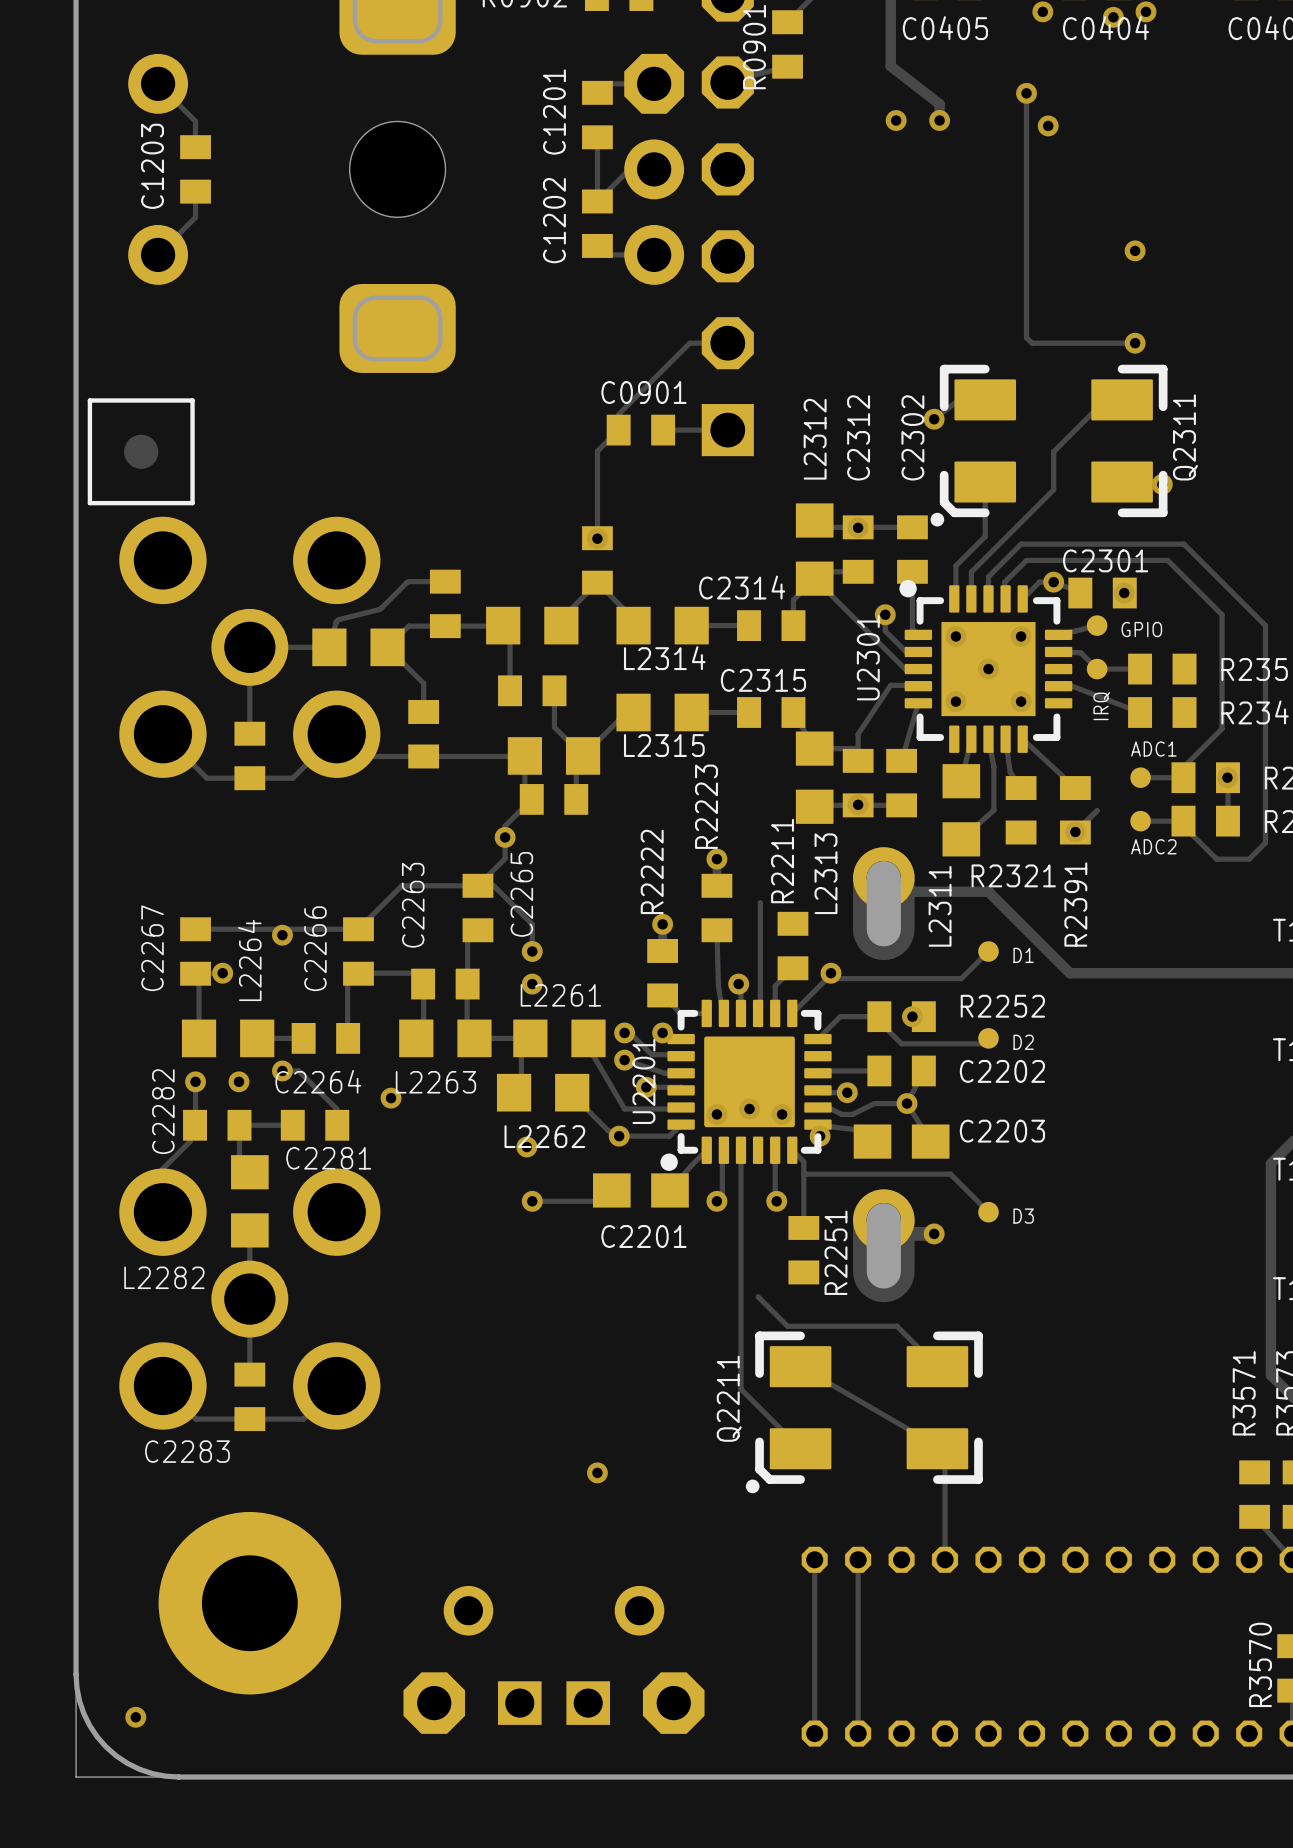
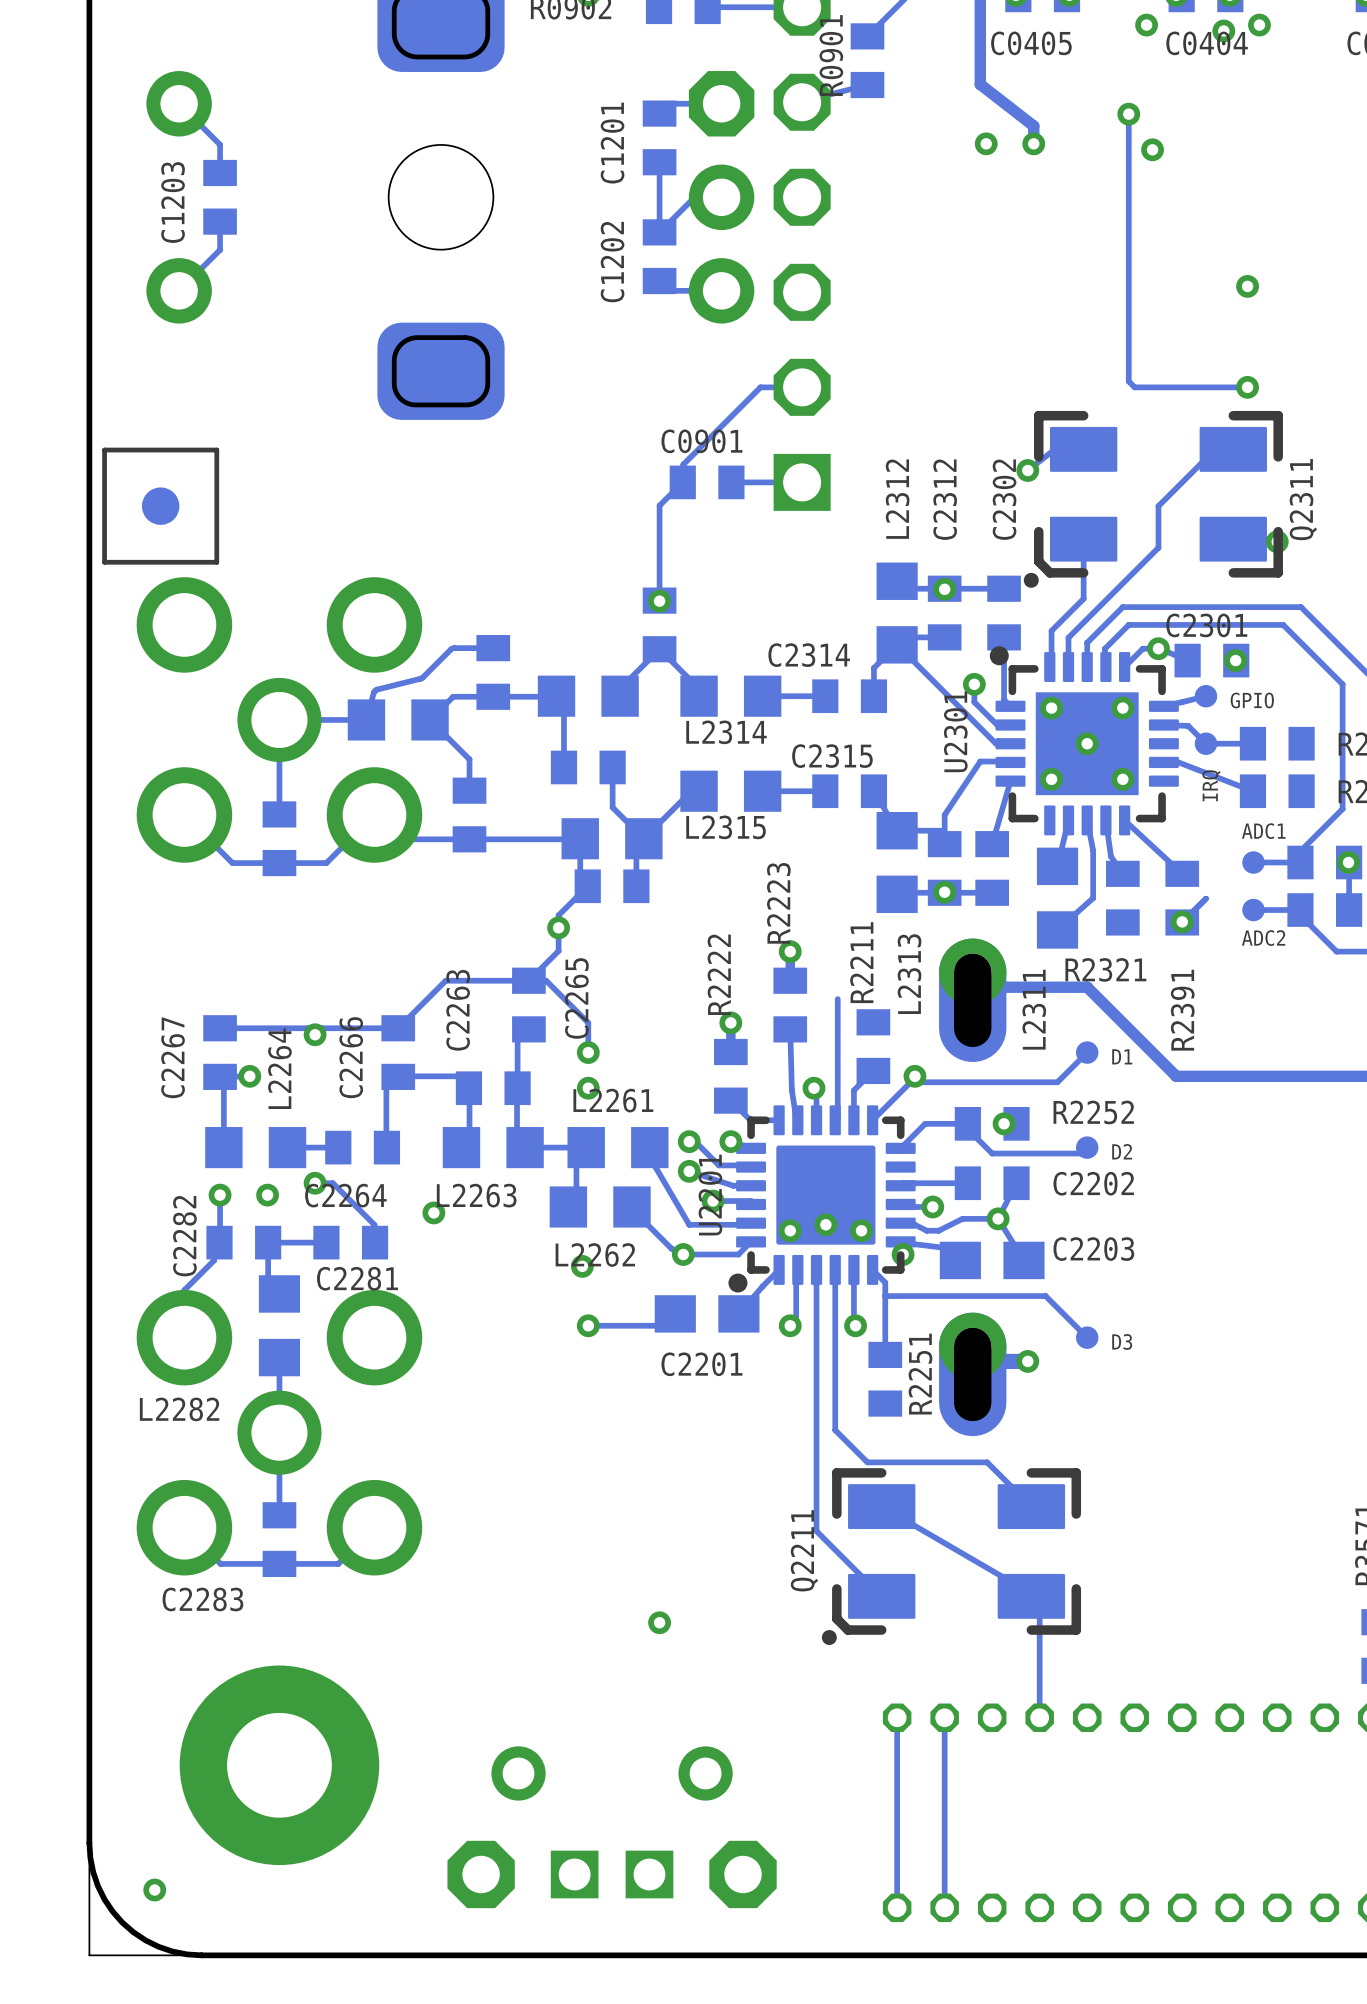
track: none -> (835, 1269) (835, 1430)

